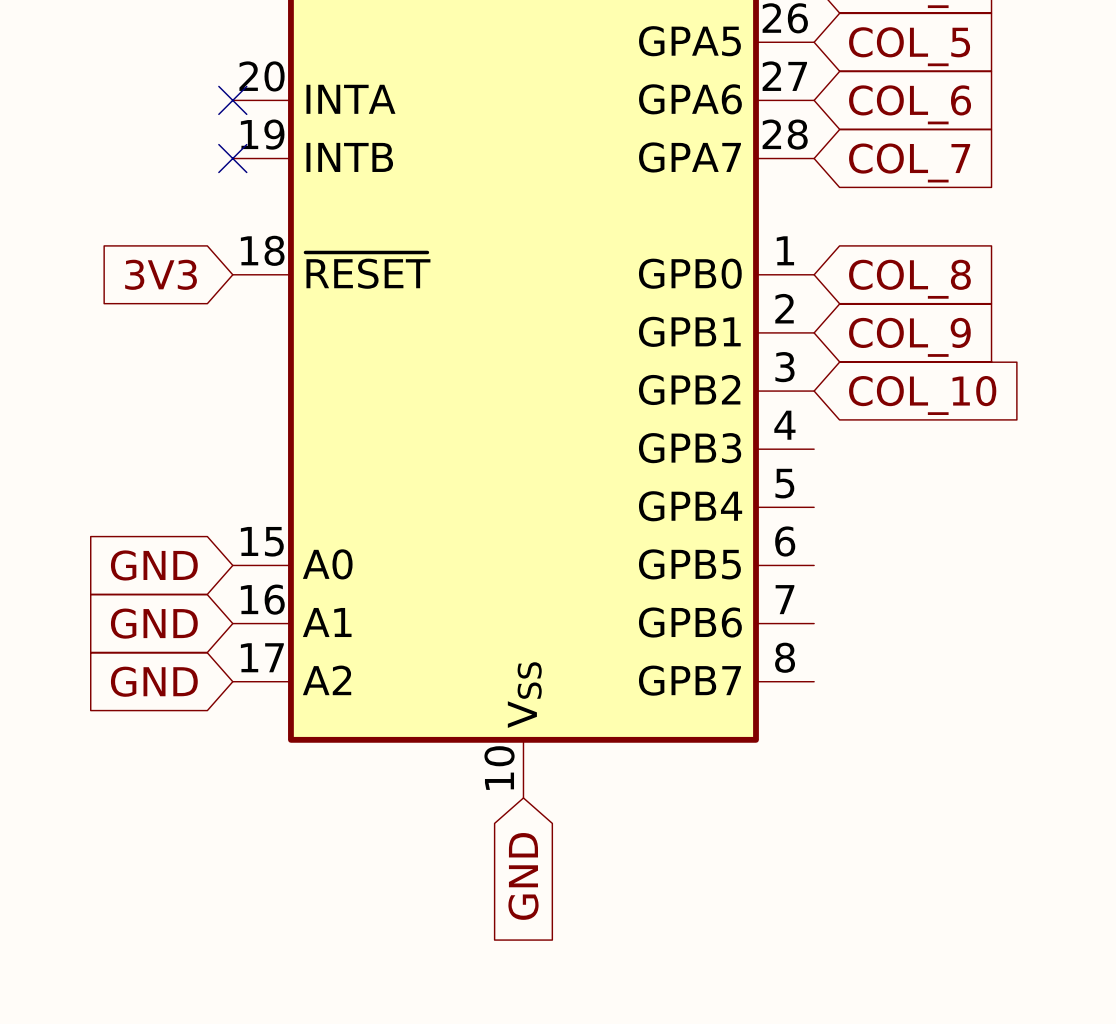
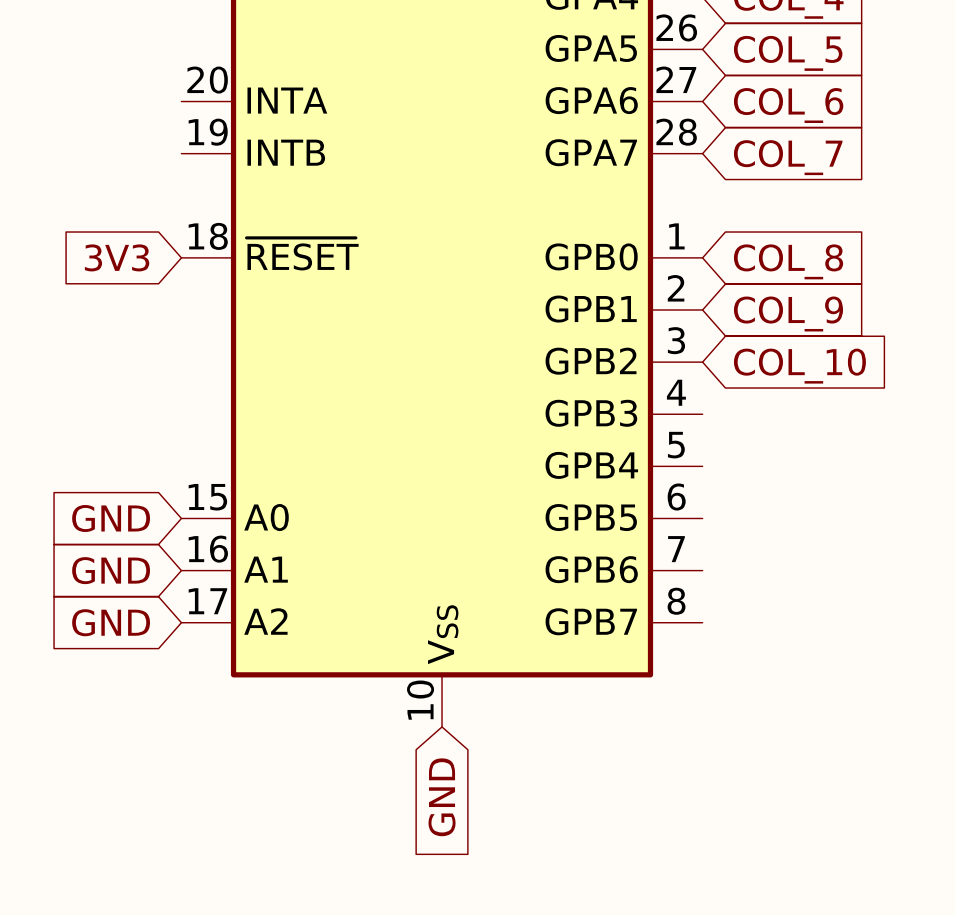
no-connect mark: (232, 100) -> none
no-connect mark: (232, 158) -> none

